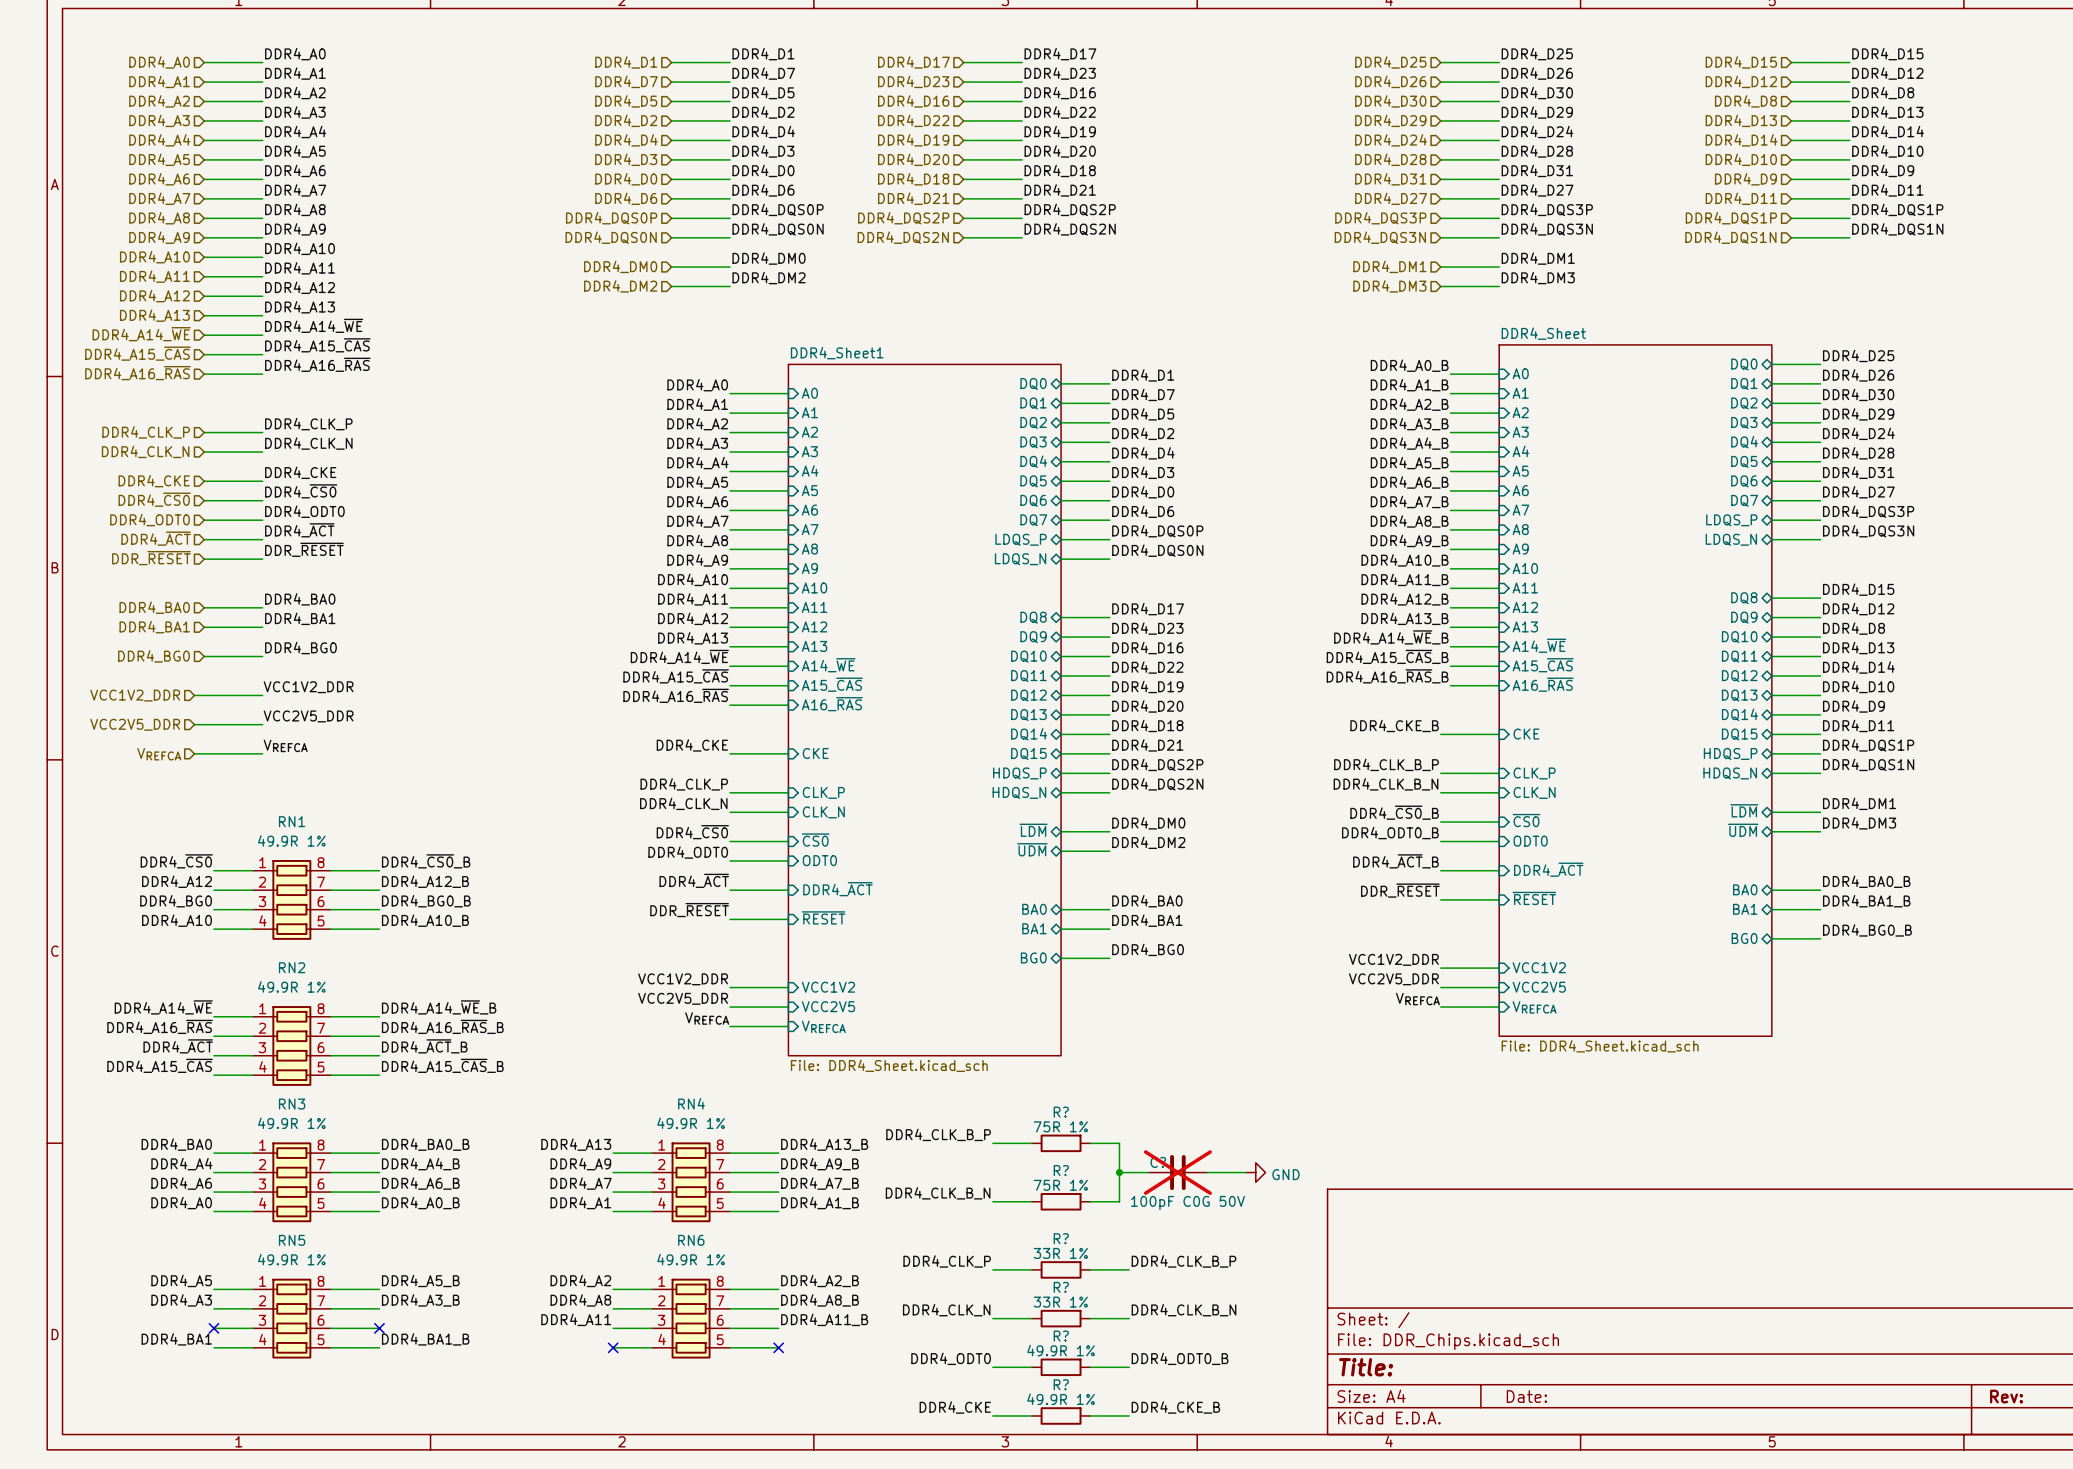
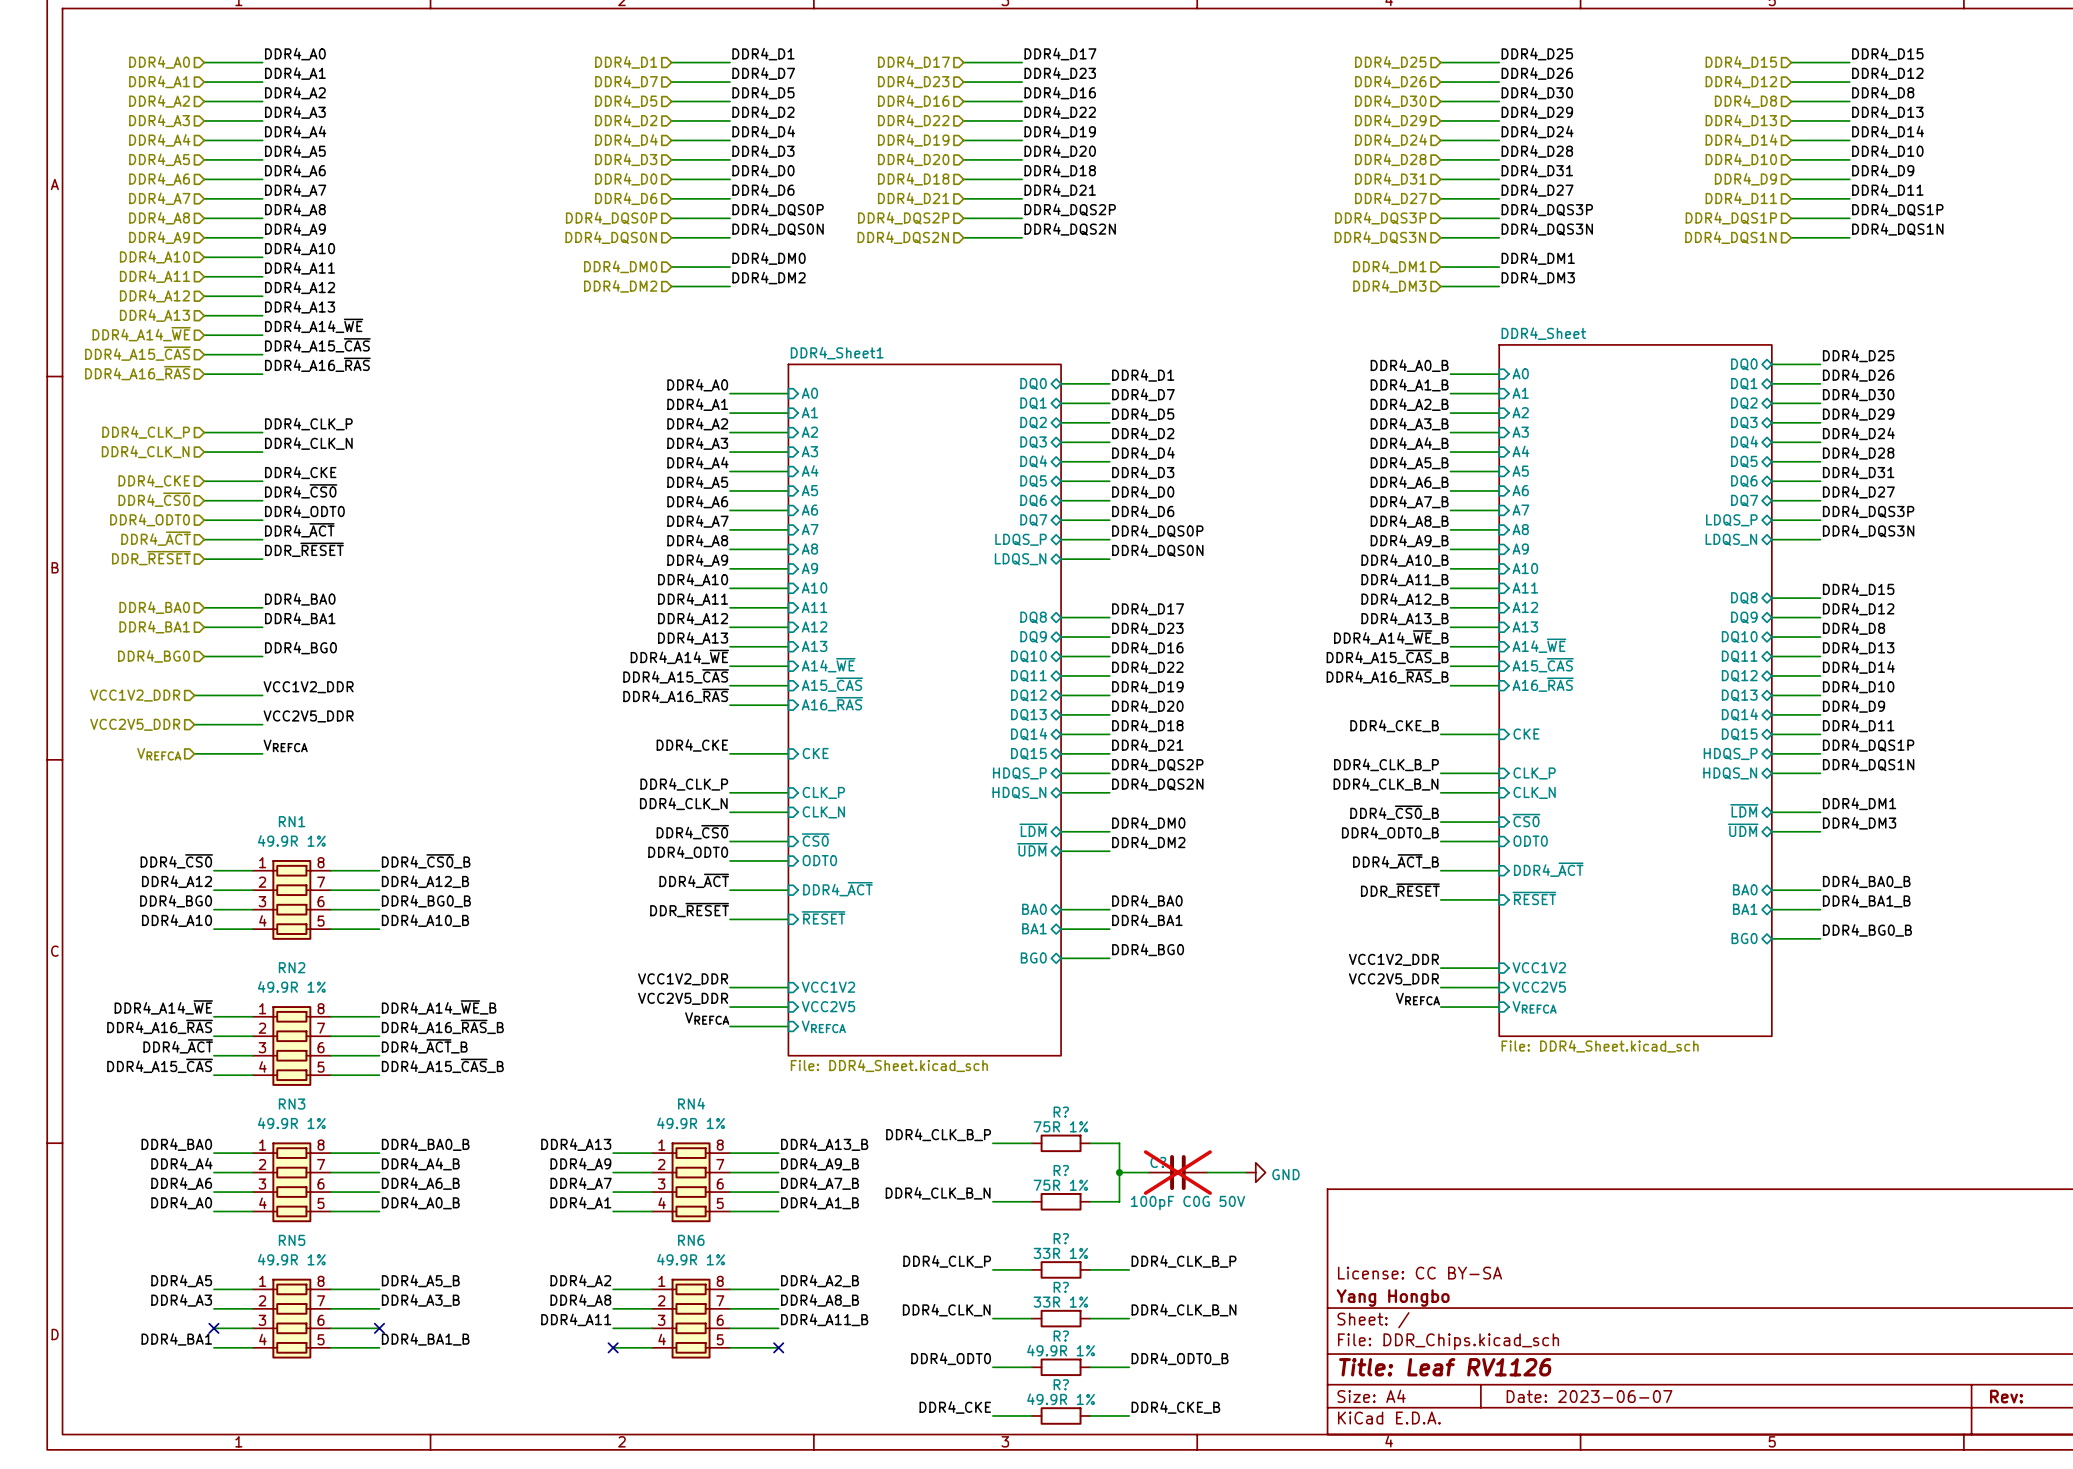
title block: none -> License: CC BY-SA (1420, 1273)
title block: none -> Yang Hongbo (1393, 1298)
title block: Title: (1366, 1367) -> Title: Leaf RV1126 (1445, 1367)
title block: Date: (1526, 1396) -> Date: 2023-06-07 (1589, 1396)

